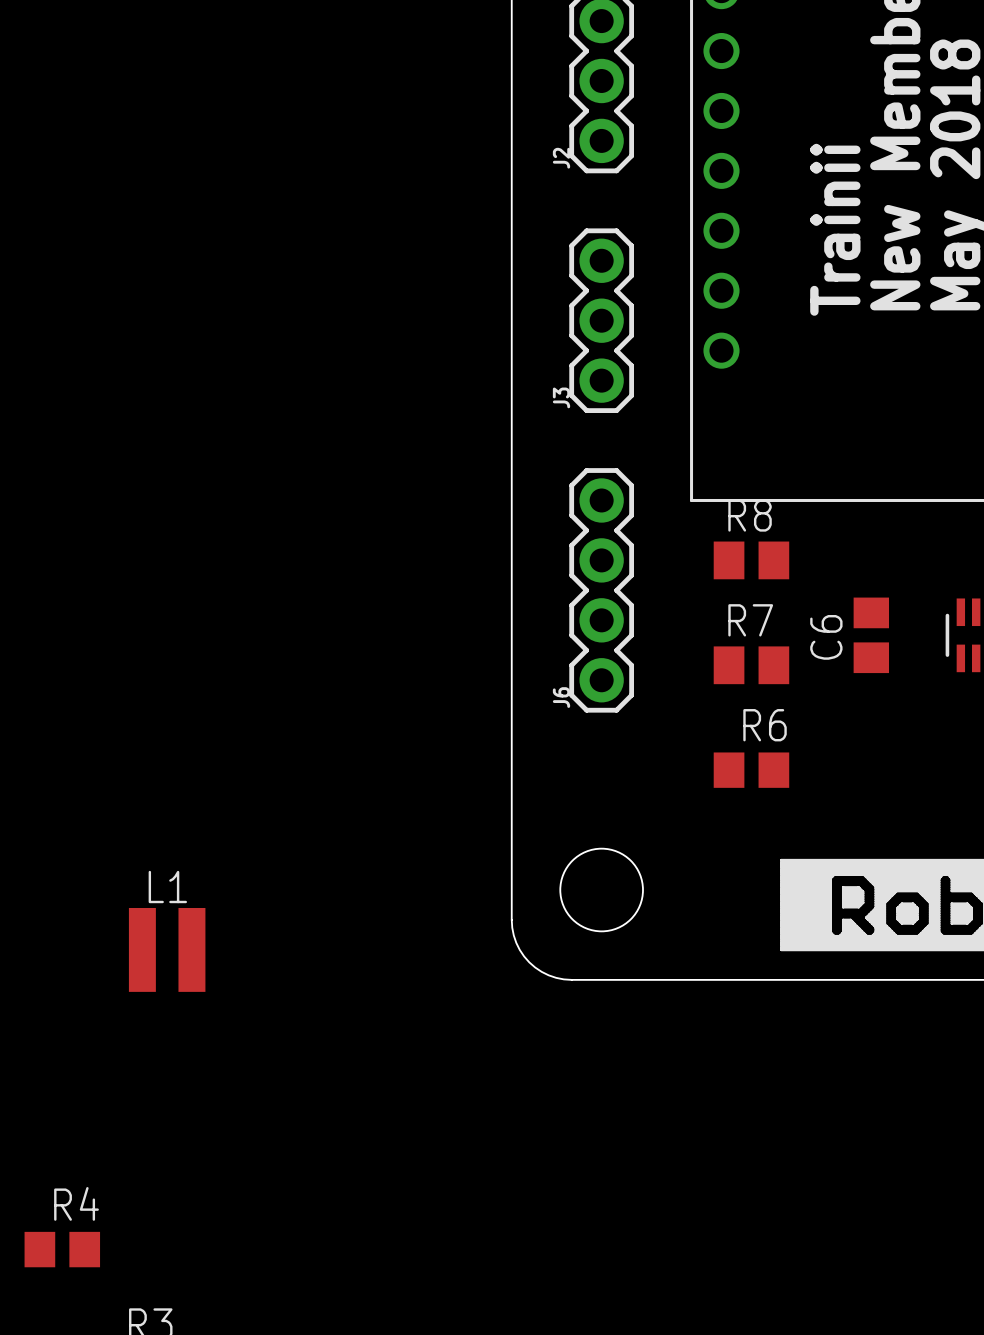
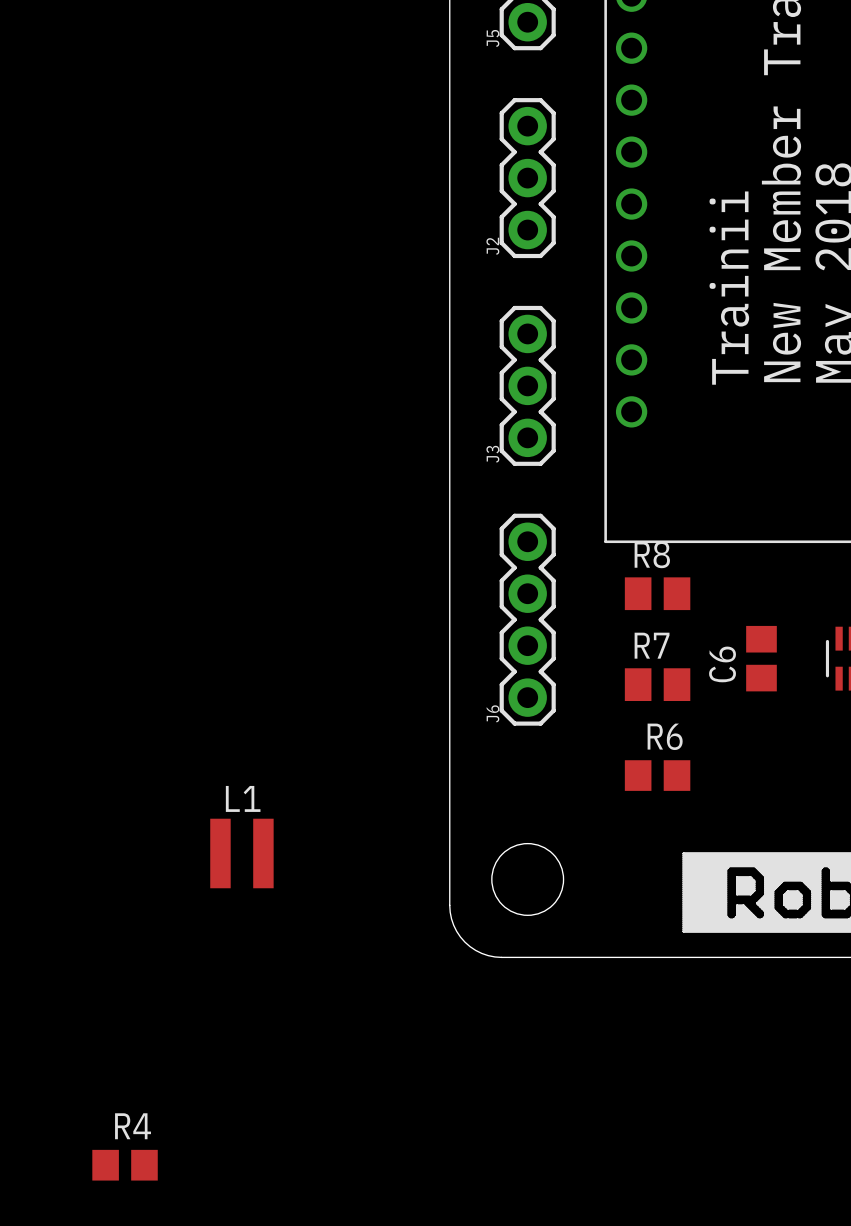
L1 footprint: [128, 907, 206, 992] -> [210, 818, 274, 889]
R4 position: (62, 1249) -> (125, 1165)

